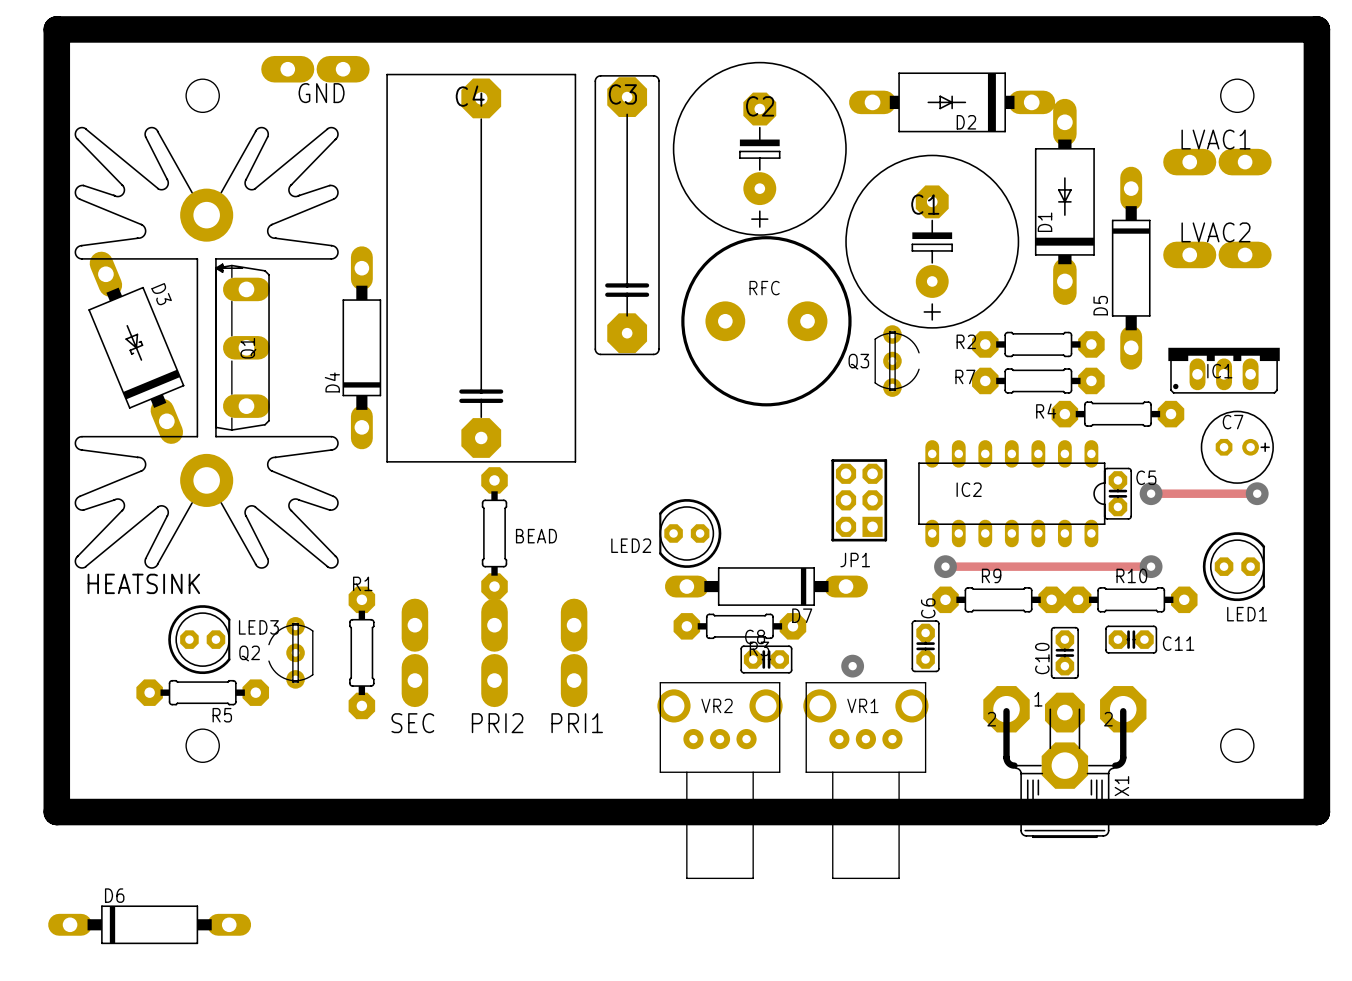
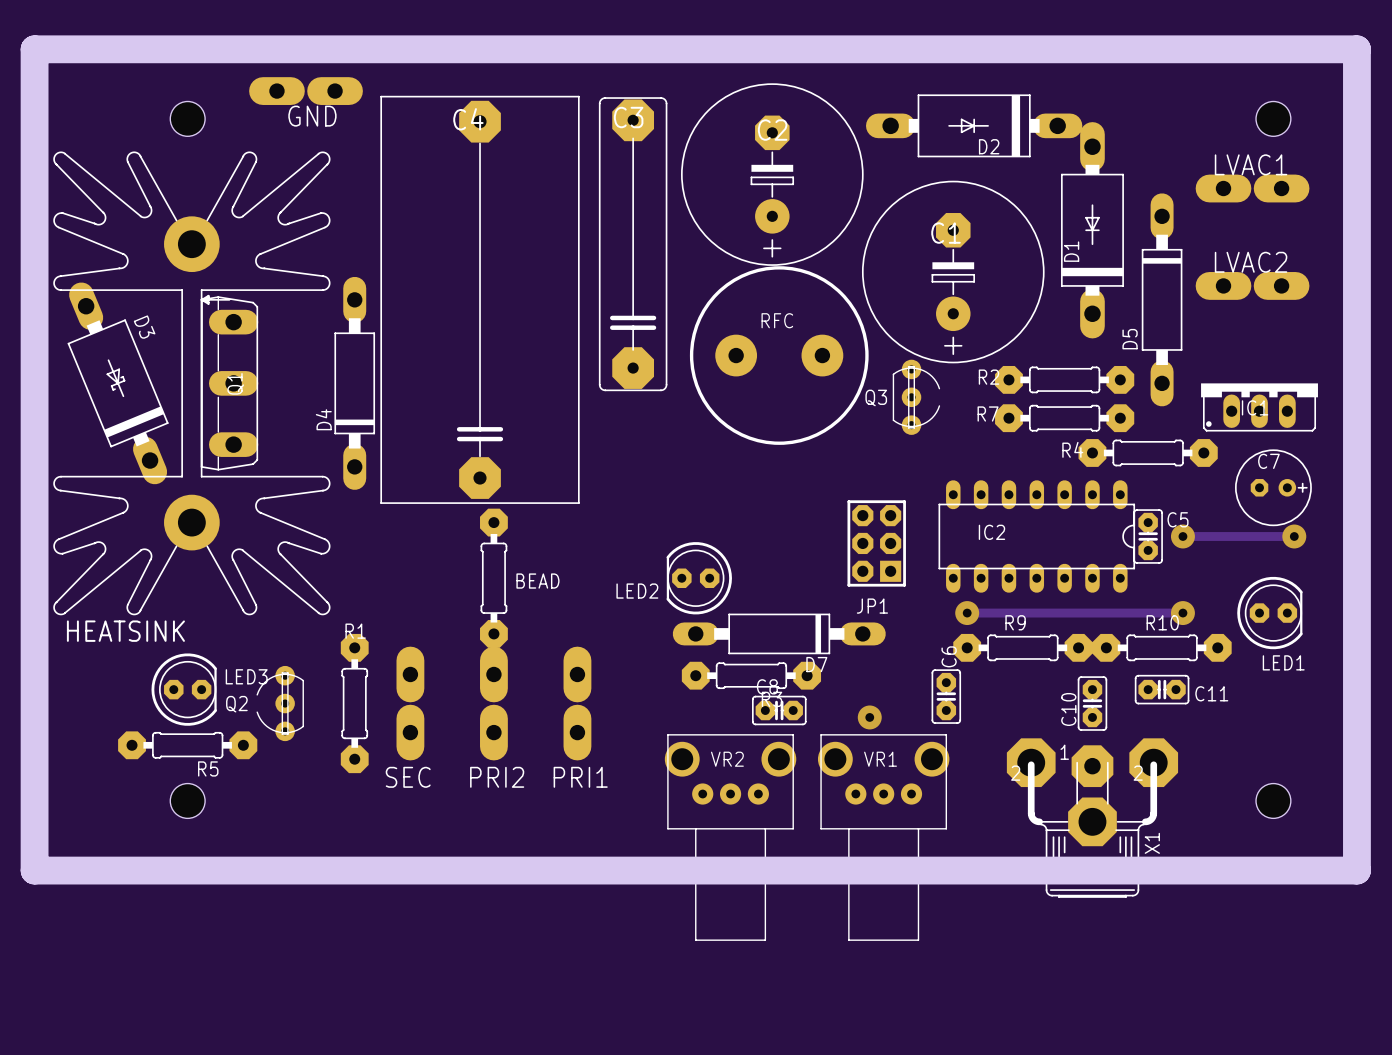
D6: (149, 924) -> none

